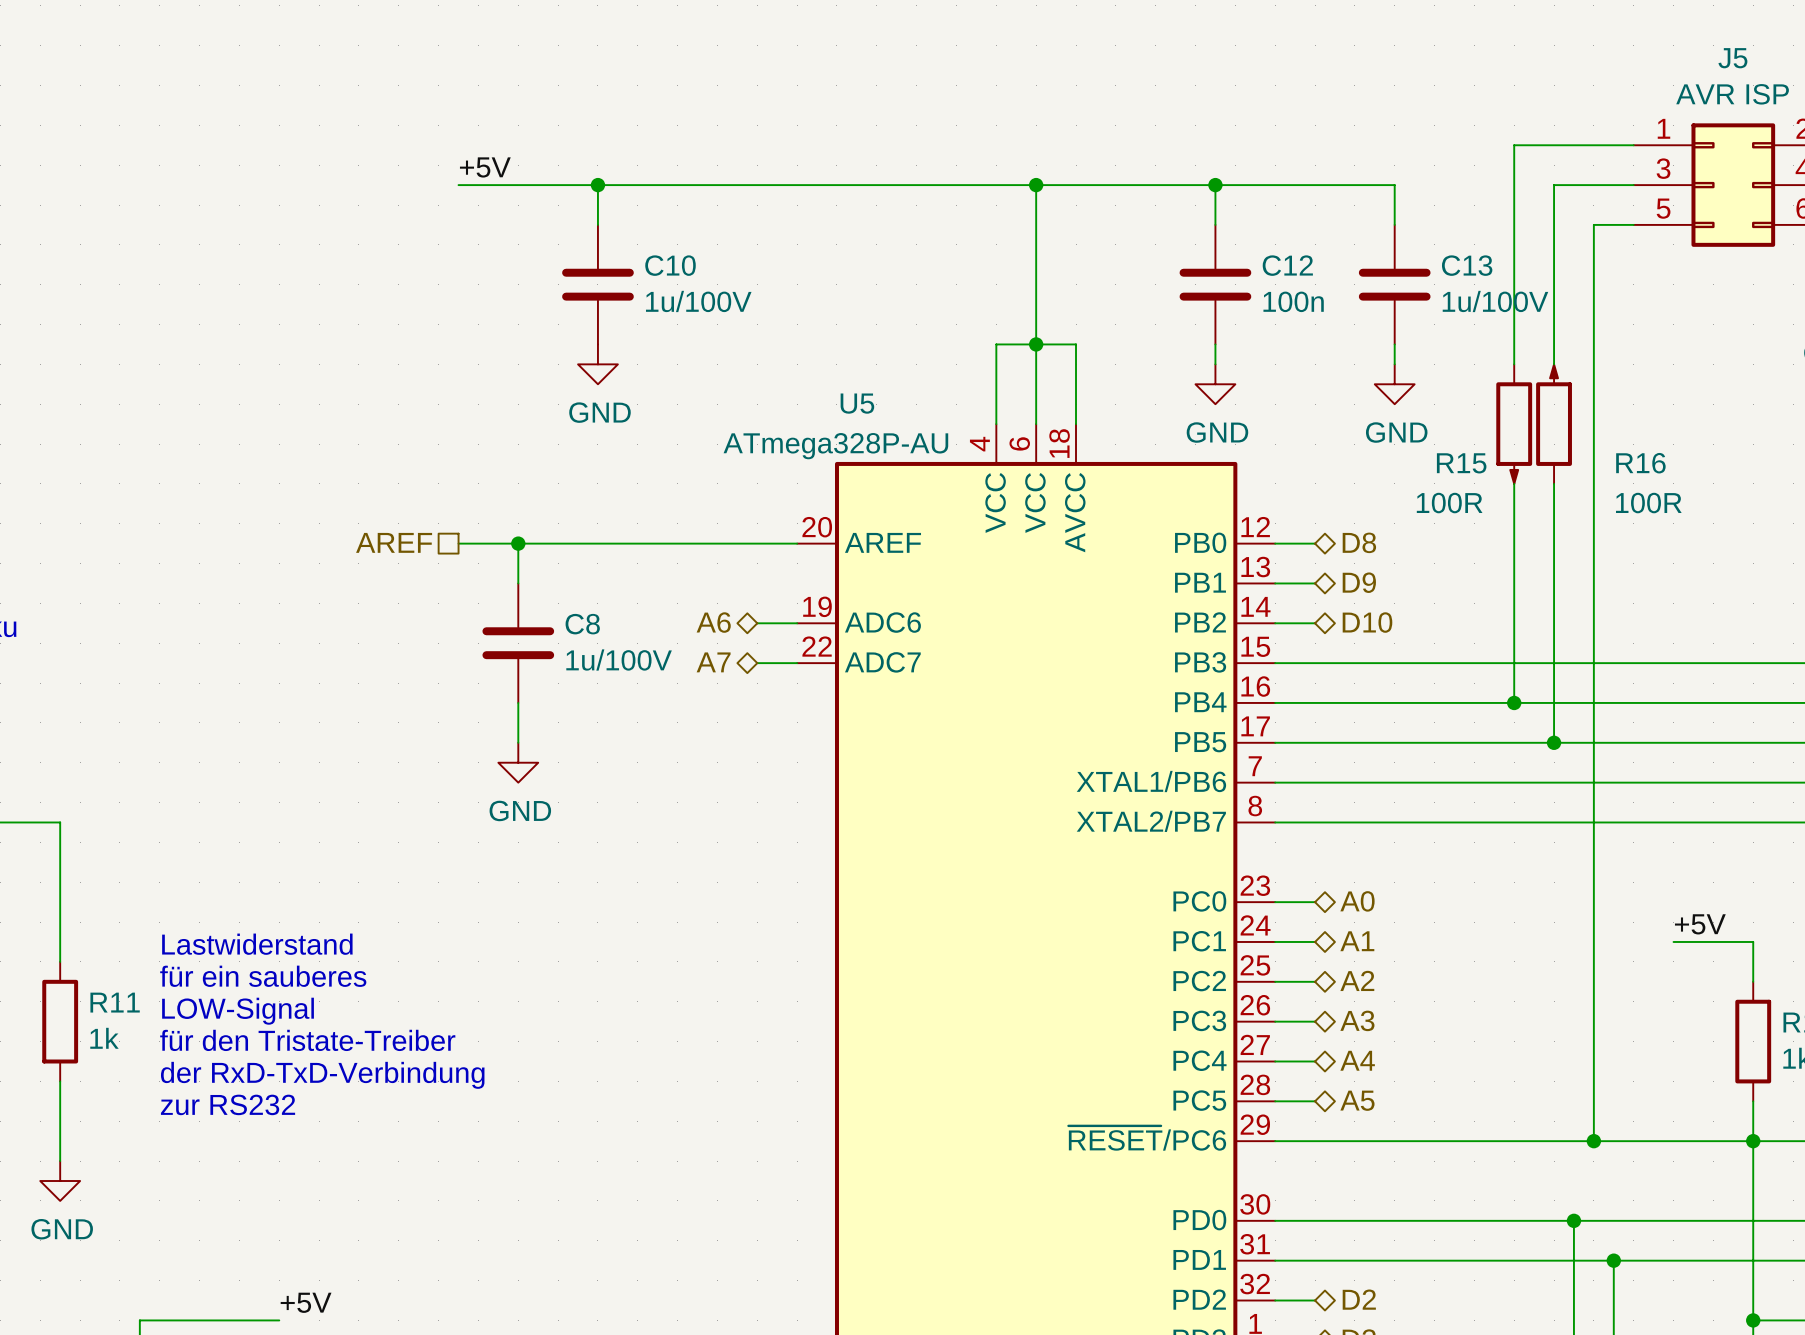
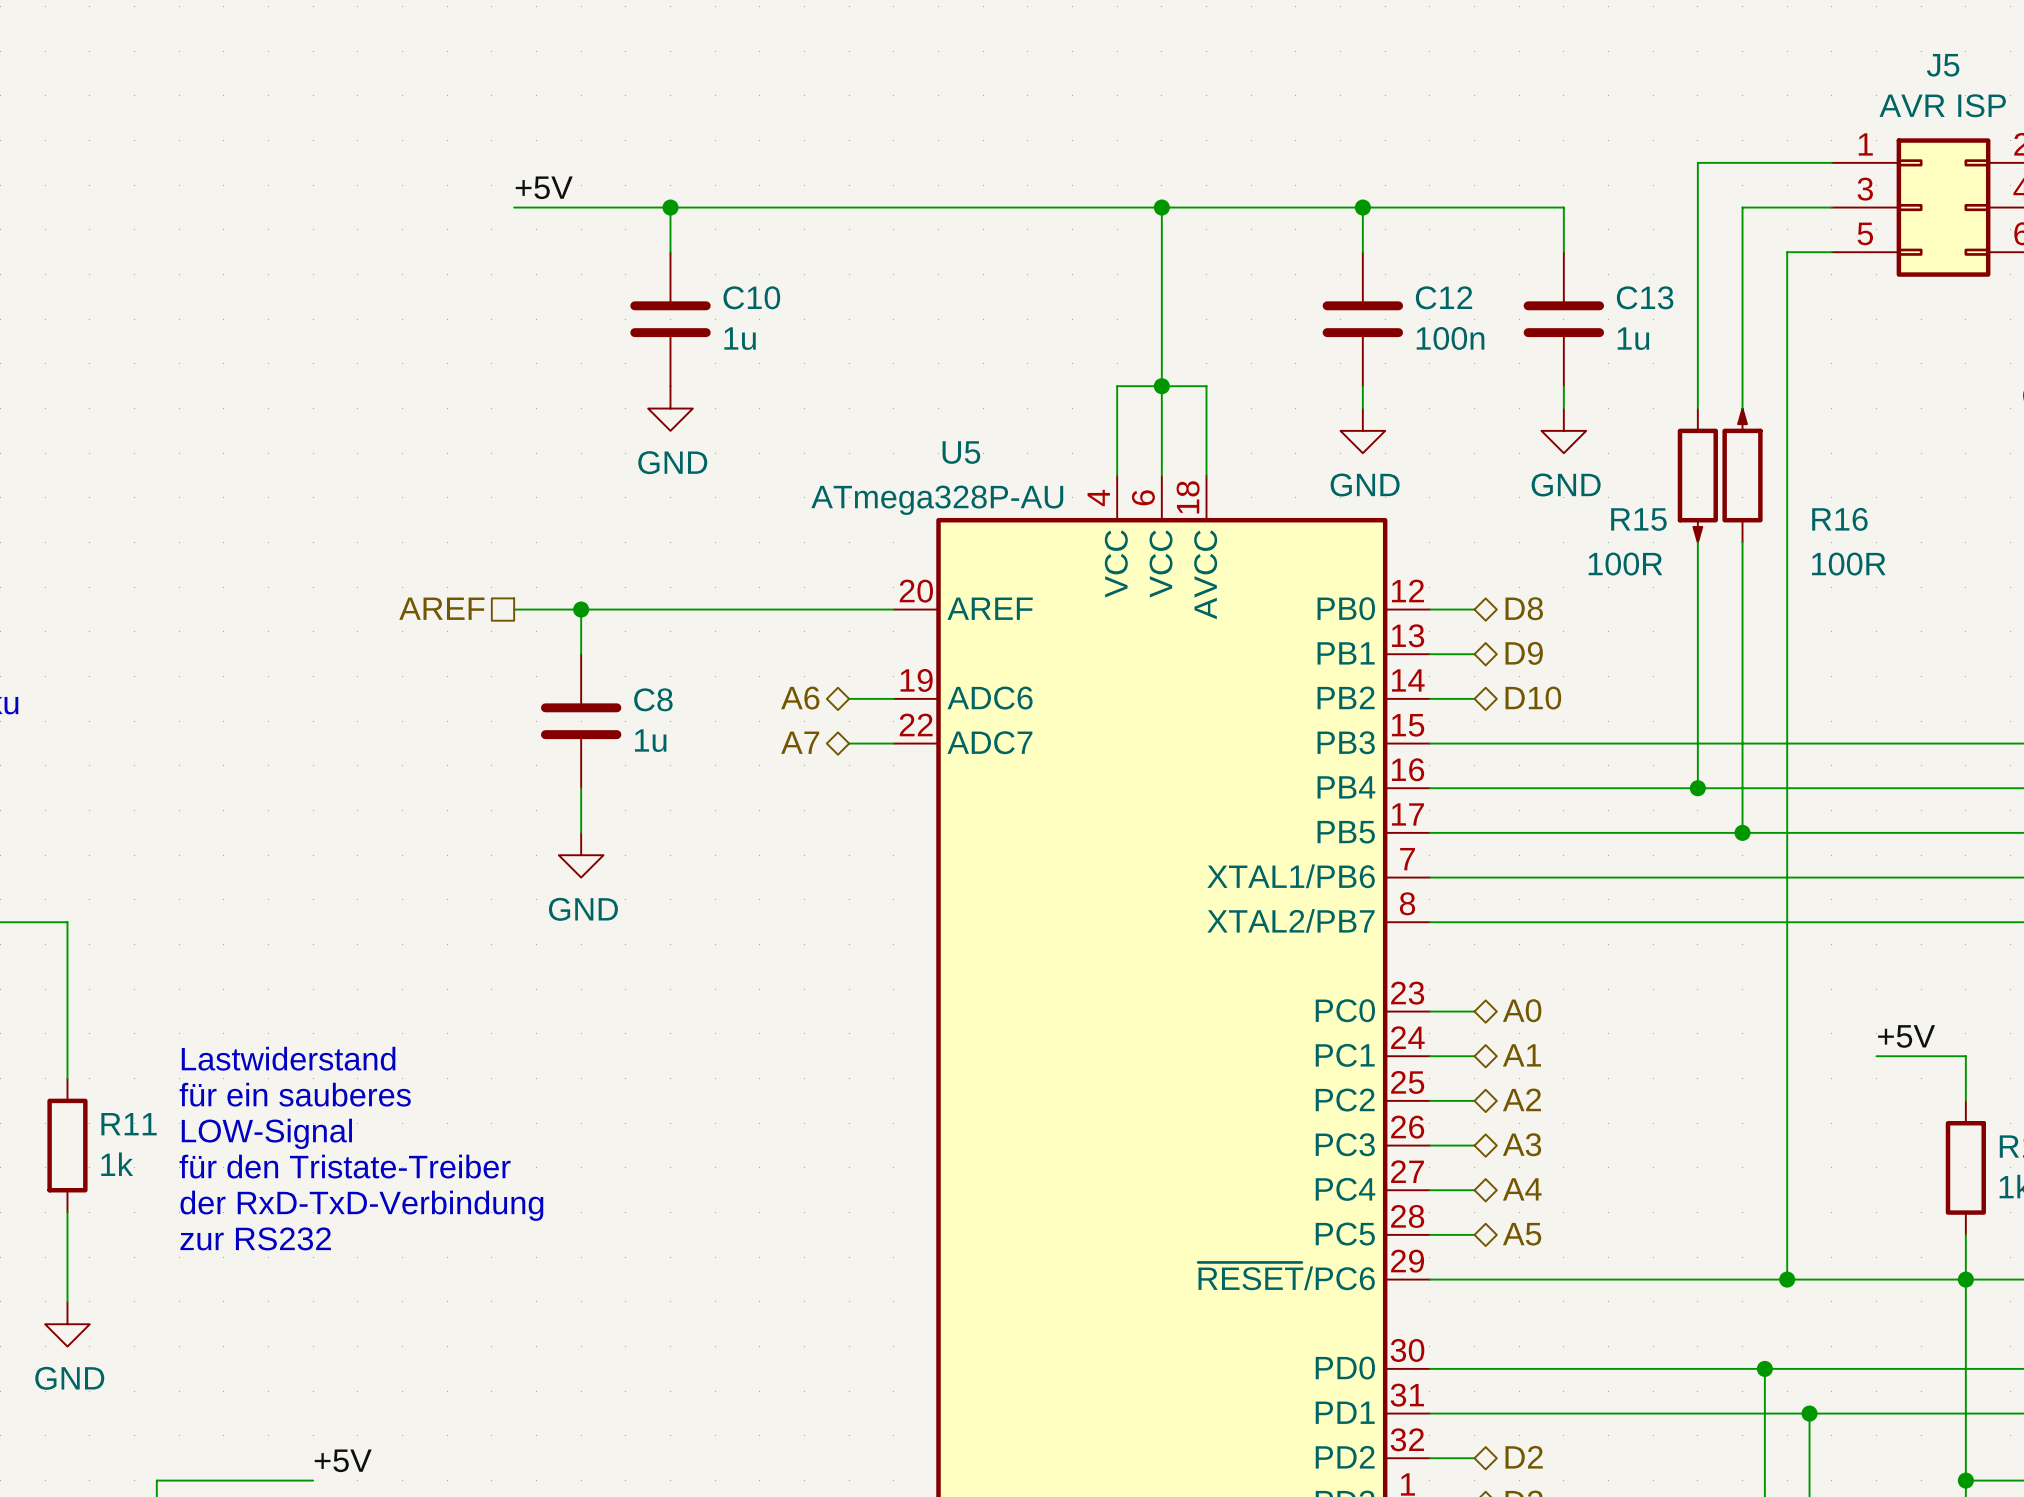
C10 value: 1u/100V (698, 301) -> 1u (740, 338)
C13 value: 1u/100V (1495, 301) -> 1u (1633, 338)
C8 value: 1u/100V (619, 660) -> 1u (650, 740)

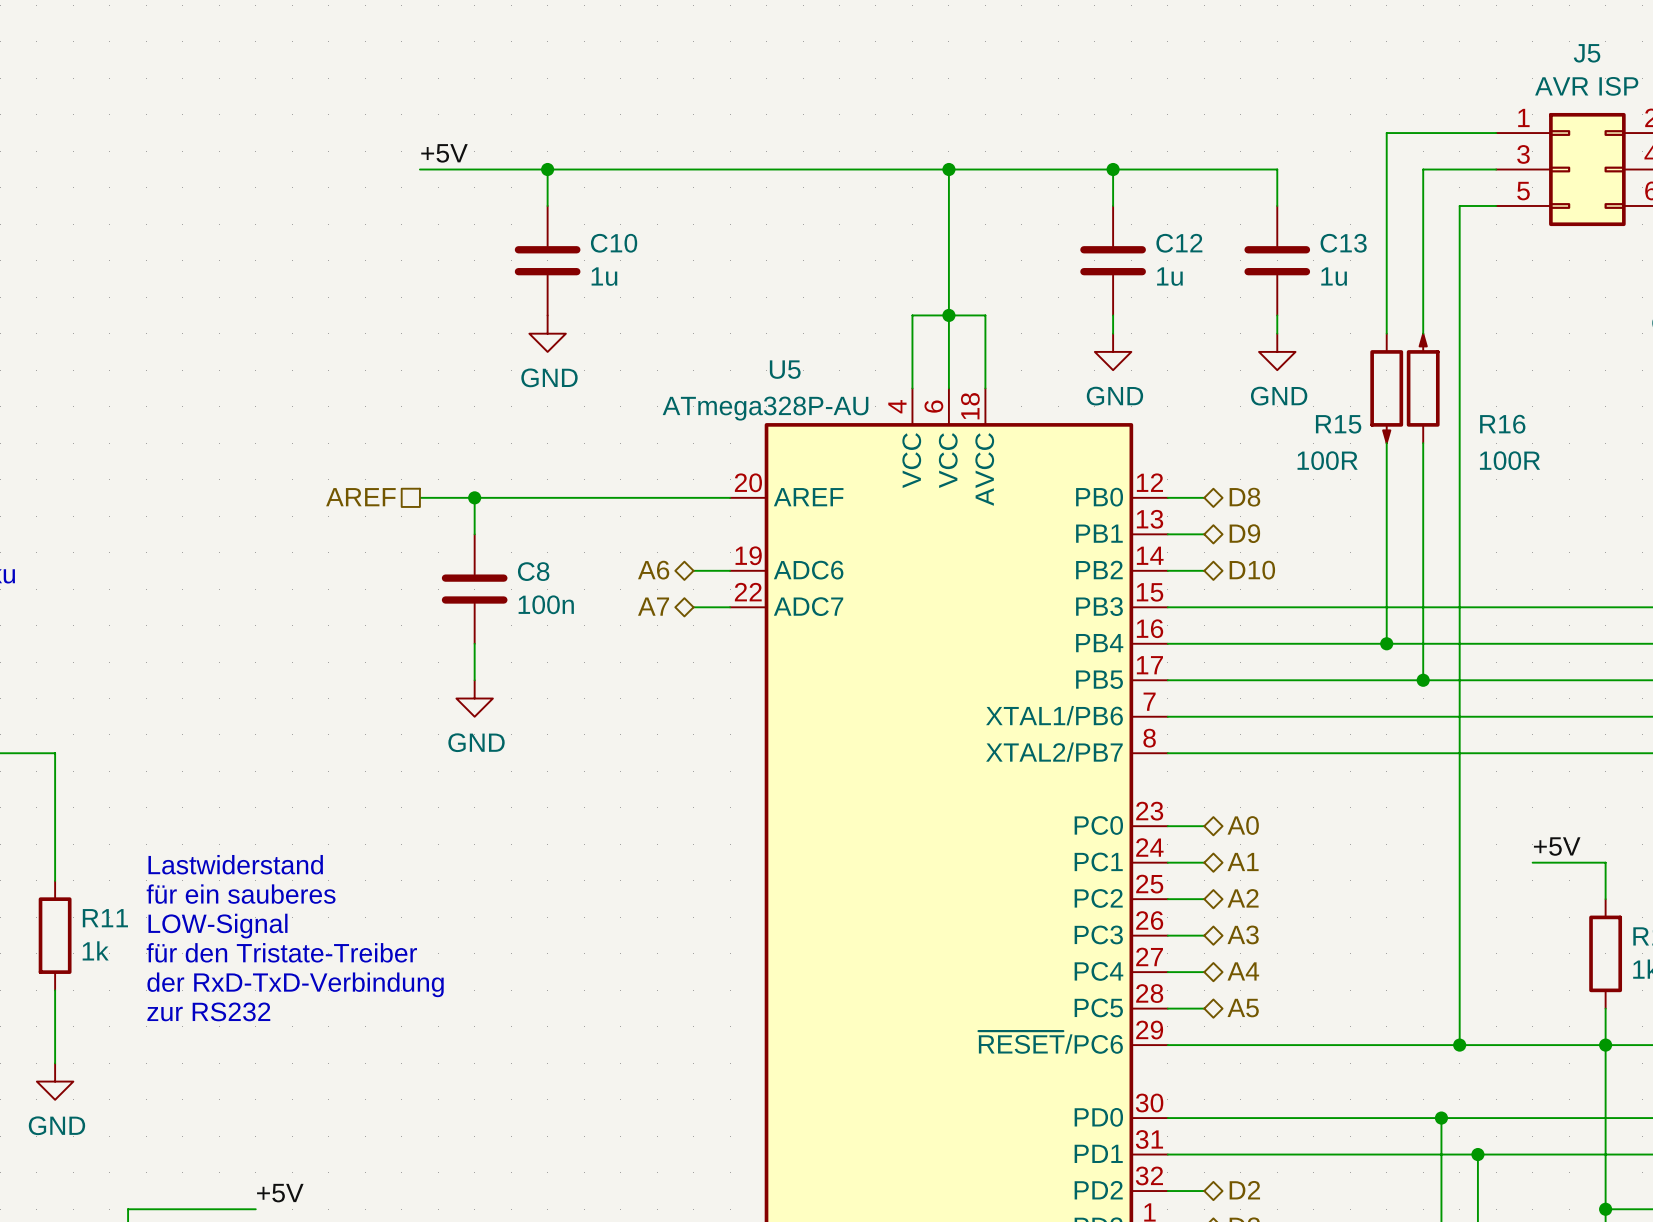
C12 value: 100n (1450, 338) -> 1u (1169, 276)
C8 value: 1u (650, 740) -> 100n (546, 604)

